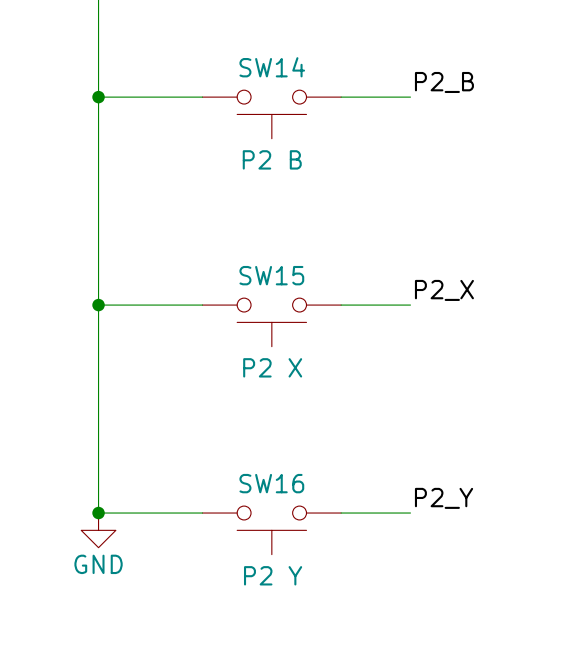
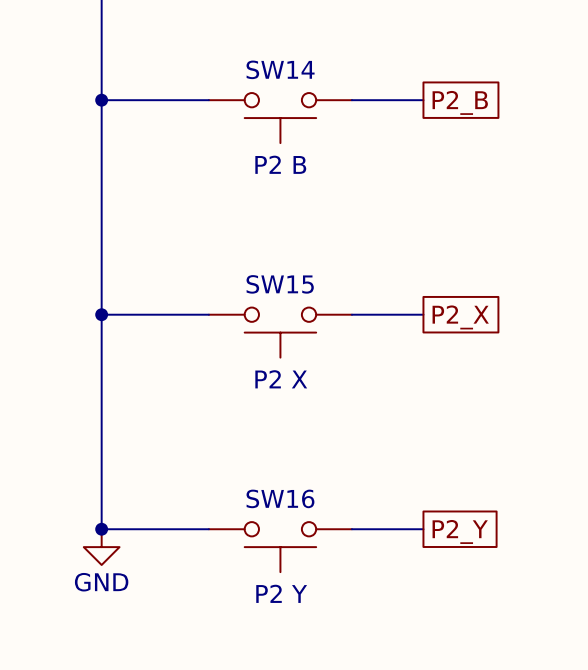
label: P2_B (444, 82) -> none
global label: none -> P2_B (460, 102)
label: P2_X (444, 290) -> none
global label: none -> P2_X (460, 317)
label: P2_Y (444, 498) -> none
global label: none -> P2_Y (460, 531)

